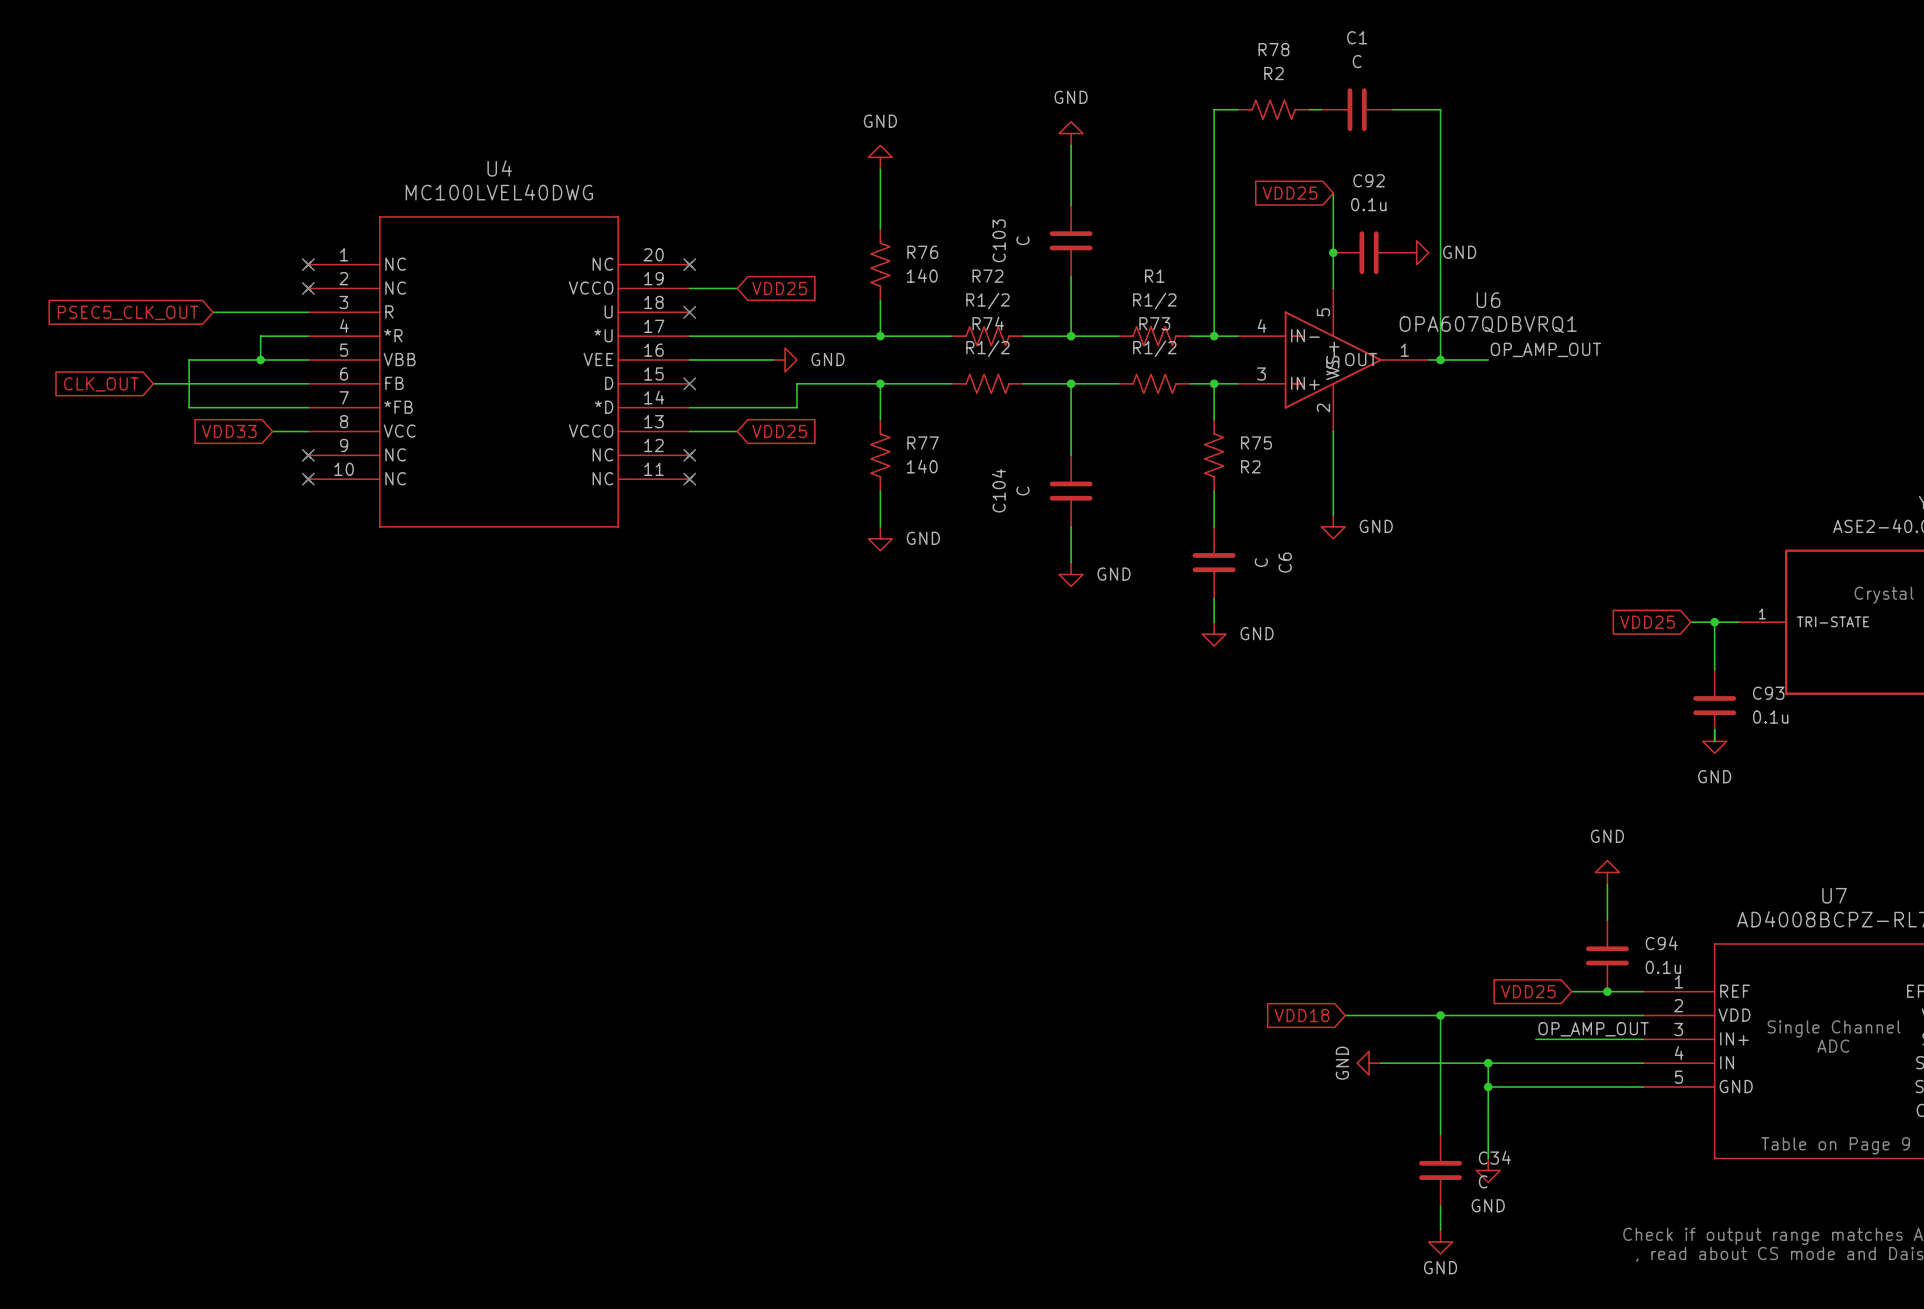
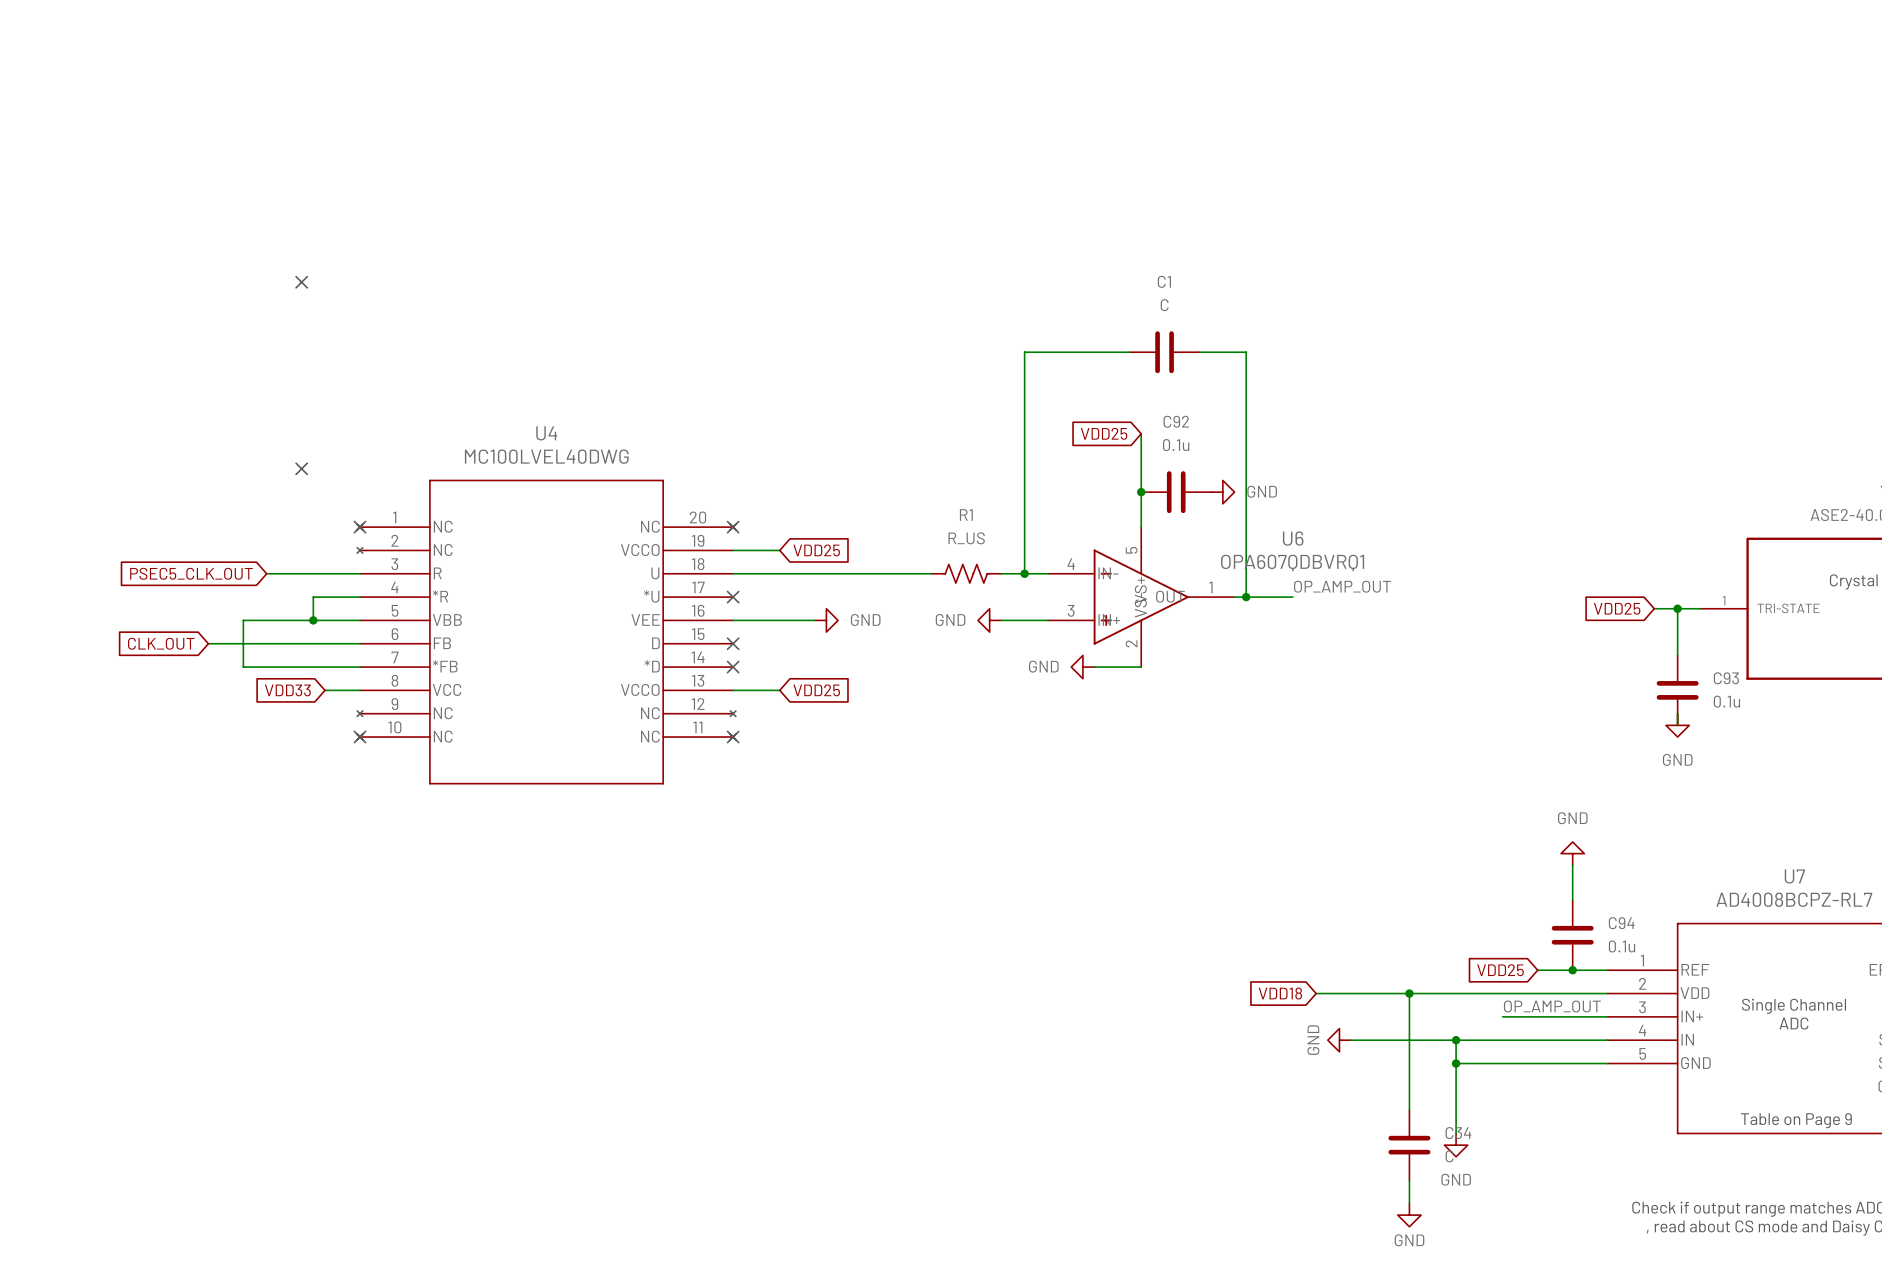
wire: (1237, 109) (1214, 109) (1214, 336) -> none
R78: R2 (1273, 109) -> none
wire: (1309, 109) (1321, 109) -> none
C1 position: (1357, 109) -> (1164, 352)
wire: (1392, 109) (1440, 109) (1440, 359) -> none
power symbol: GND (1071, 133) -> none
wire: (1071, 145) (1071, 205) -> none
power symbol: GND (880, 157) -> none
wire: (880, 169) (880, 228) -> none
global label: VDD25 (1290, 193) -> none
wire: (1333, 193) (1333, 288) -> none
C103: C (1071, 240) -> none
junction: (1333, 252) -> none
C92 position: (1369, 252) -> (1176, 492)
power symbol: GND (1416, 252) -> none
no-connect mark: (308, 264) -> none
no-connect mark: (689, 264) -> none
R76: 140 (880, 264) -> none
wire: (1071, 276) (1071, 336) -> none
wire: (689, 288) (737, 288) -> none
global label: VDD25 (779, 288) -> none
wire: (880, 300) (880, 336) -> none
R1 value: R1/2 (1154, 301) -> R_US (966, 538)
global label: PSEC5_CLK_OUT (127, 312) -> none
wire: (212, 312) (308, 312) -> none
no-connect mark: (689, 312) -> none
wire: (308, 336) (260, 336) (260, 359) -> none
wire: (689, 336) (951, 336) -> none
junction: (880, 336) -> none
R72: R1/2 (987, 336) -> none
wire: (1023, 336) (1118, 336) -> none
junction: (1071, 336) -> none
R1 position: (1154, 336) -> (966, 573)
wire: (1190, 336) (1237, 336) -> none
junction: (1214, 336) -> none
label: OP_AMP_OUT (1545, 349) -> none
junction: (260, 359) -> none
wire: (308, 359) (189, 359) (189, 407) (308, 407) -> none
wire: (689, 359) (773, 359) -> none
power symbol: GND (785, 359) -> none
wire: none -> (1129, 352) (1024, 352) (1024, 573)
wire: none -> (1199, 352) (1246, 352) (1246, 597)
U6 position: (1333, 359) -> (1141, 597)
wire: (1428, 359) (1488, 359) -> none
junction: (1440, 359) -> none
U4 position: (499, 371) -> (546, 632)
wire: (153, 383) (308, 383) -> none
no-connect mark: (689, 383) -> none
wire: (880, 383) (880, 419) -> none
junction: (880, 383) -> none
wire: (951, 383) (796, 383) (796, 407) (689, 407) -> none
R74: R1/2 (987, 383) -> none
wire: (1023, 383) (1118, 383) -> none
wire: (1071, 383) (1071, 455) -> none
junction: (1071, 383) -> none
R73: R1/2 (1154, 383) -> none
wire: (1190, 383) (1237, 383) -> none
wire: (1214, 383) (1214, 419) -> none
junction: (1214, 383) -> none
global label: CLK_OUT (101, 384) -> none
global label: VDD33 (229, 431) -> none
wire: (272, 431) (308, 431) -> none
wire: (689, 431) (737, 431) -> (733, 550) (779, 550)
global label: VDD25 (779, 431) -> none
wire: (1333, 431) (1333, 514) -> none
global label: none -> VDD25 (1104, 433)
wire: none -> (1141, 433) (1141, 527)
no-connect mark: (308, 455) -> none
no-connect mark: (689, 455) -> none
R77: 140 (880, 455) -> none
R75: R2 (1214, 455) -> none
no-connect mark: (689, 479) -> none
wire: (880, 491) (880, 526) -> none
C104: C (1071, 491) -> none
wire: (1214, 491) (1214, 526) -> none
junction: none -> (1141, 492)
power symbol: none -> GND (1222, 492)
wire: (1071, 526) (1071, 562) -> none
power symbol: GND (1333, 526) -> none
no-connect mark: none -> (359, 527)
no-connect mark: none -> (733, 527)
power symbol: GND (880, 538) -> none
global label: none -> VDD25 (816, 550)
C6: C (1214, 562) -> none
power symbol: GND (1071, 574) -> none
wire: none -> (266, 573) (359, 573)
wire: none -> (733, 573) (931, 573)
wire: none -> (1001, 573) (1047, 573)
junction: none -> (1024, 573)
global label: none -> PSEC5_CLK_OUT (191, 573)
wire: (1214, 598) (1214, 622) -> none
label: none -> OP_AMP_OUT (1342, 586)
wire: none -> (359, 597) (313, 597) (313, 620)
no-connect mark: none -> (733, 597)
wire: none -> (1234, 597) (1292, 597)
junction: none -> (1246, 597)
junction: none -> (313, 620)
wire: none -> (359, 620) (243, 620) (243, 667) (359, 667)
wire: none -> (733, 620) (814, 620)
power symbol: none -> GND (826, 620)
power symbol: none -> GND (989, 620)
wire: none -> (1001, 620) (1047, 620)
power symbol: GND (1214, 634) -> none
wire: none -> (208, 643) (359, 643)
no-connect mark: none -> (733, 643)
global label: none -> CLK_OUT (161, 643)
no-connect mark: none -> (733, 667)
power symbol: none -> GND (1082, 667)
wire: none -> (1094, 667) (1141, 667)
global label: none -> VDD33 (287, 690)
wire: none -> (324, 690) (359, 690)
wire: none -> (733, 690) (779, 690)
global label: none -> VDD25 (816, 690)
no-connect mark: none -> (359, 737)
no-connect mark: none -> (733, 737)

